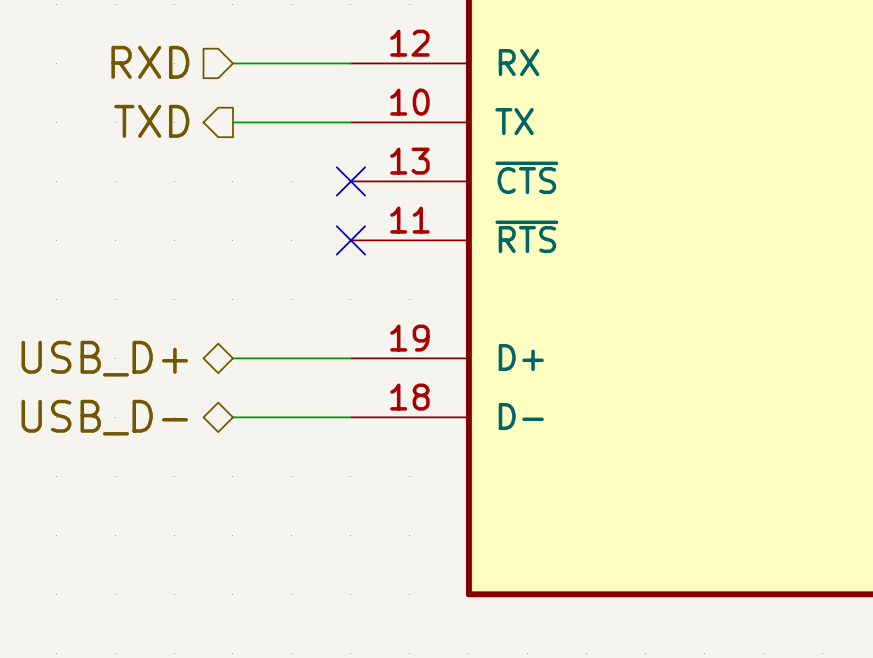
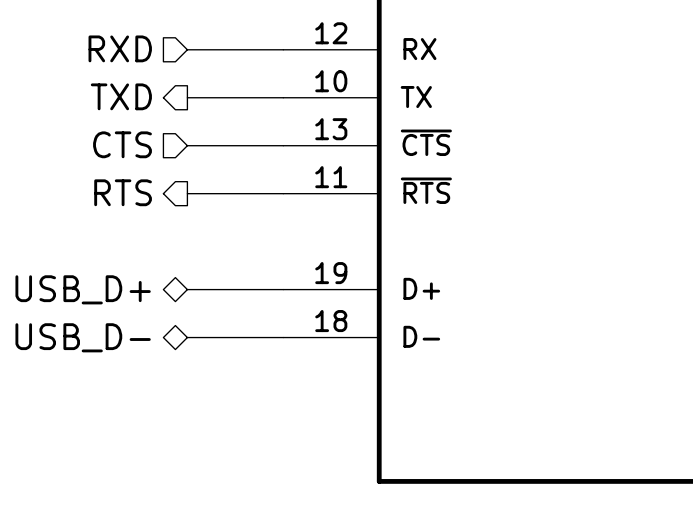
hierarchical label: none -> CTS (122, 144)
wire: none -> (187, 145) (283, 145)
no-connect mark: (350, 181) -> none
hierarchical label: none -> RTS (123, 192)
wire: none -> (187, 193) (283, 193)
no-connect mark: (350, 240) -> none

